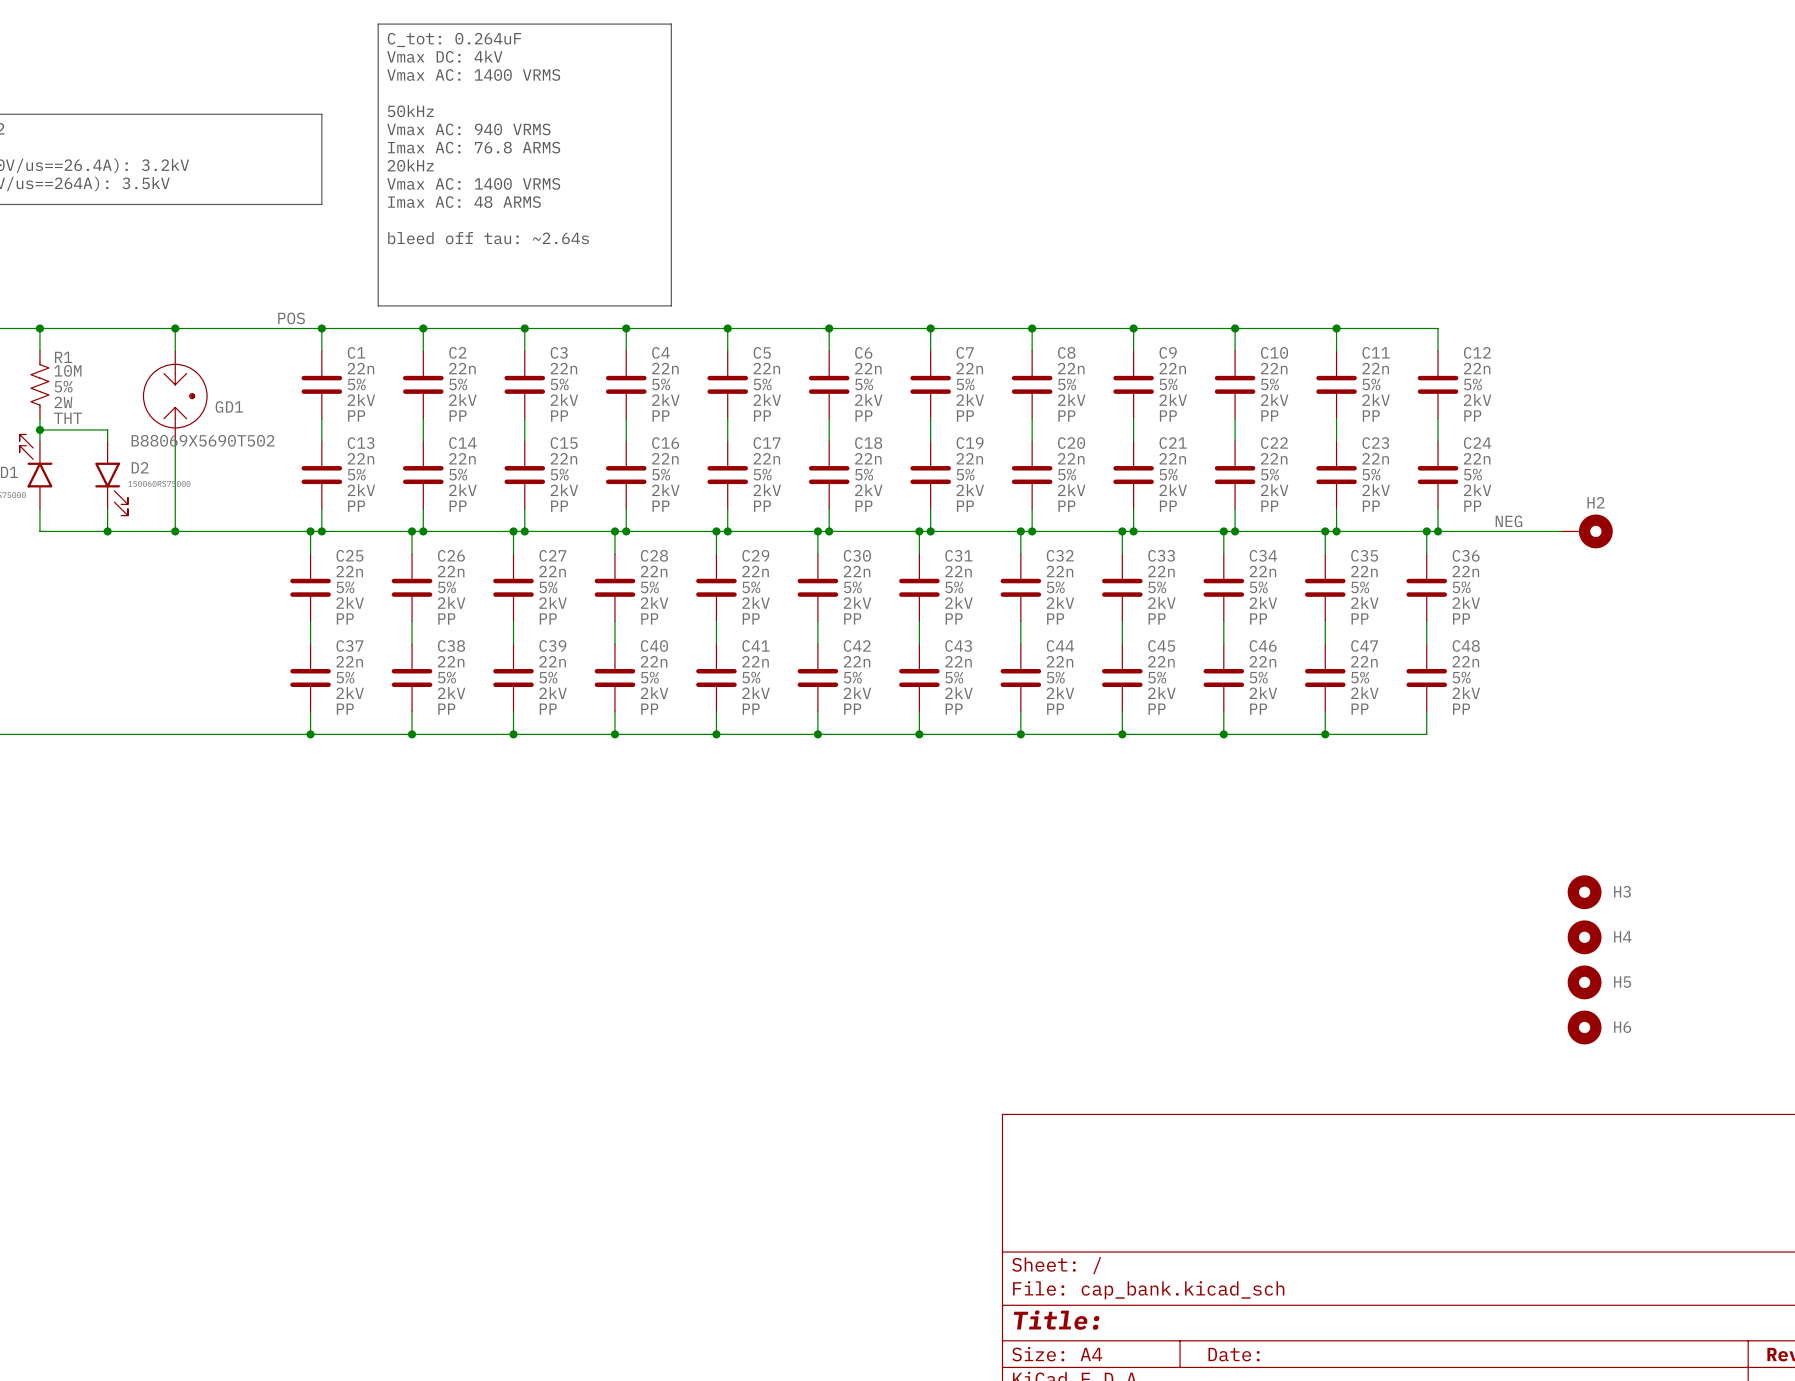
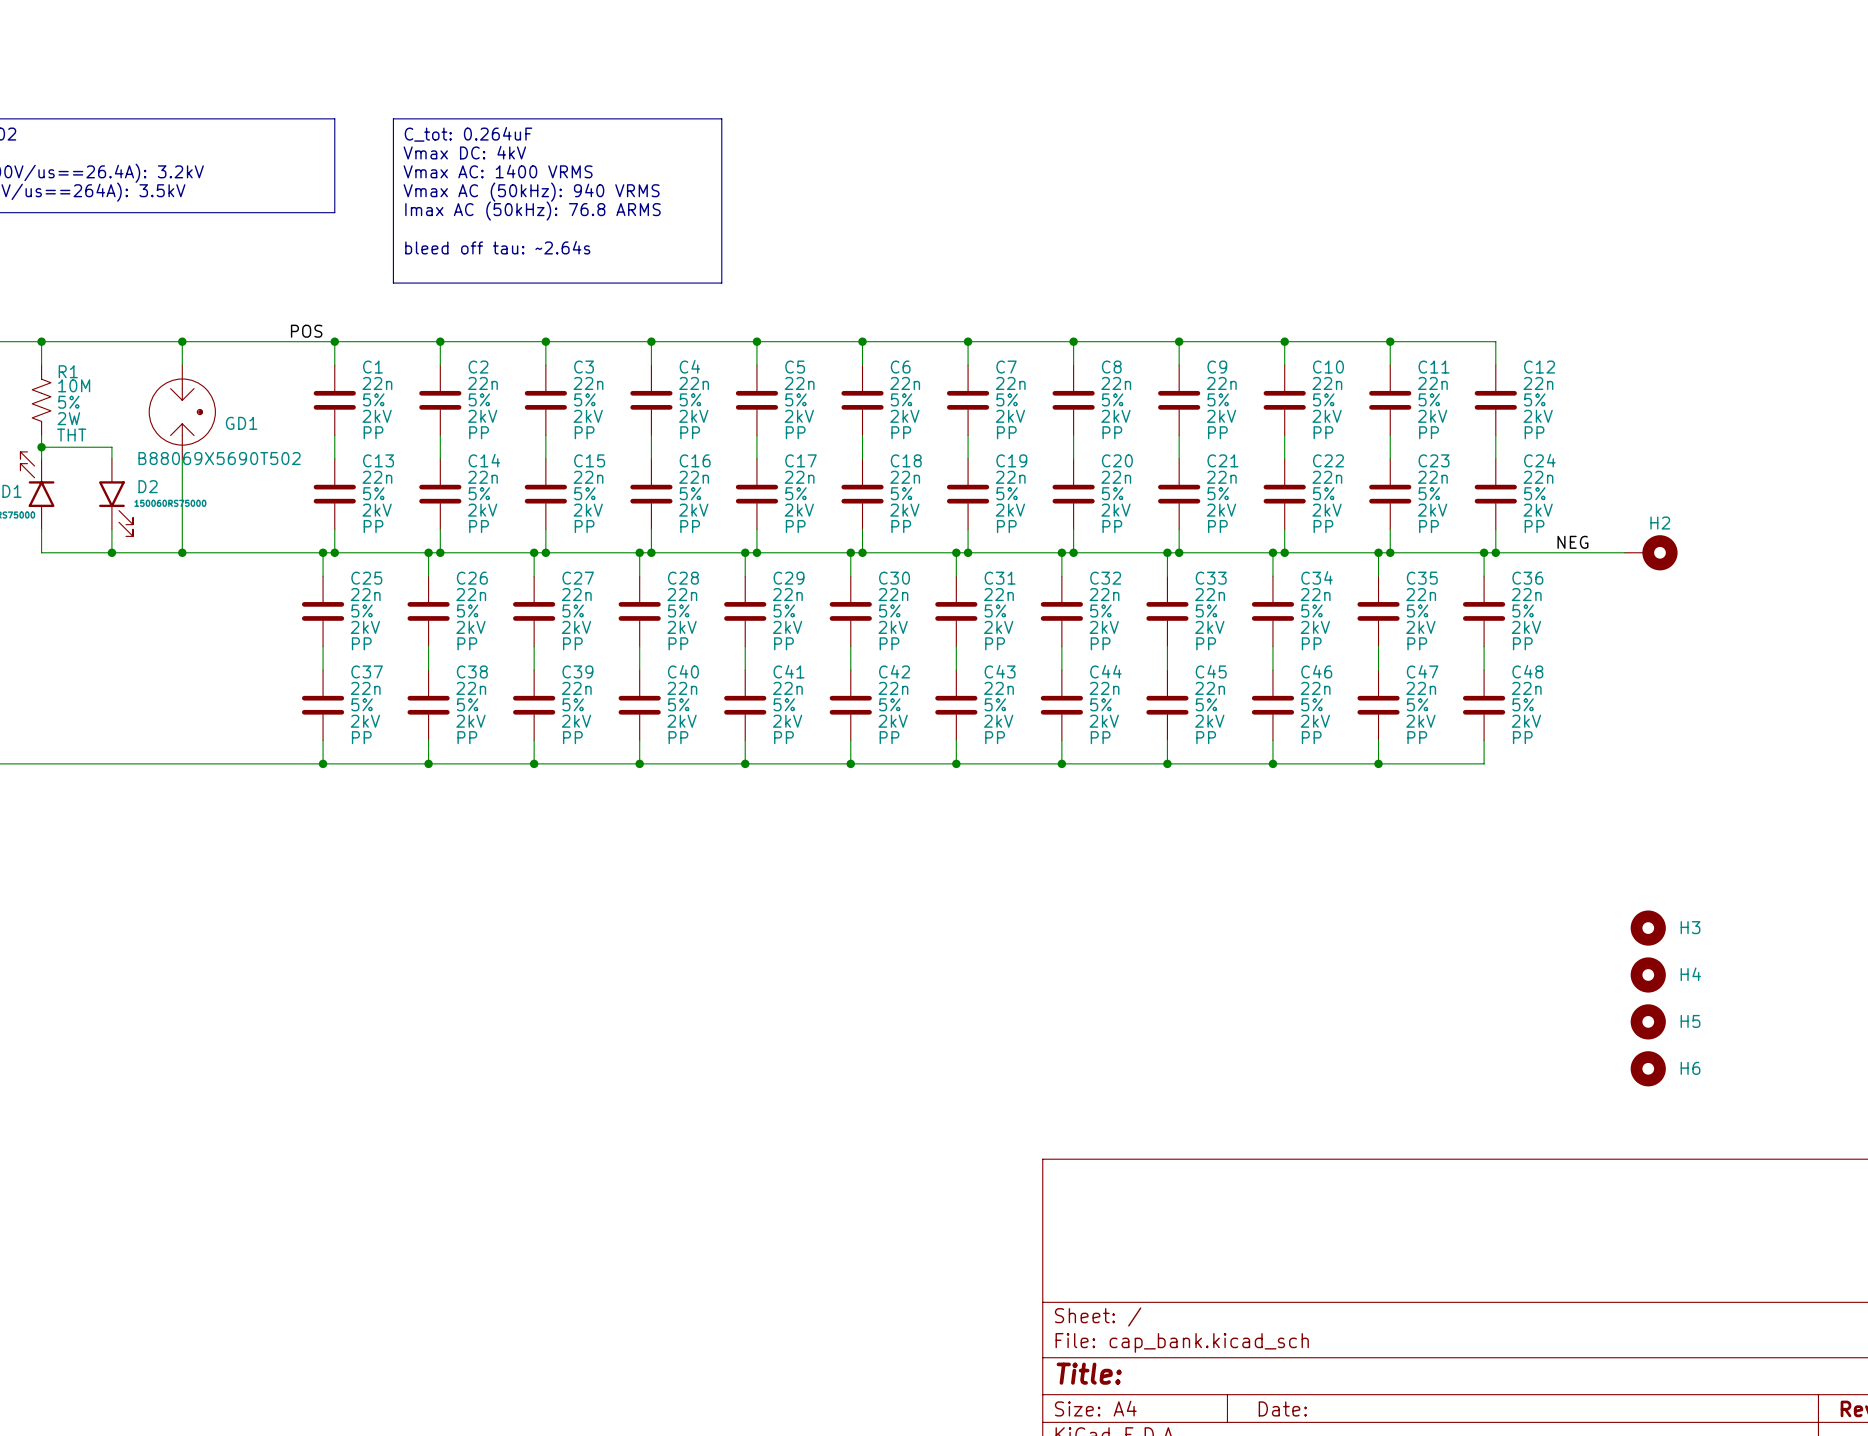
text: C_tot: 0.264uF (454, 39) -> none
text: Vmax DC: 4kV (444, 56) -> none
text: Vmax AC: 1400 VRMS (473, 75) -> none
text: 50kHz (410, 111) -> none
line: (378, 114) (378, 24) (671, 24) (671, 305) (378, 305) (378, 272) -> (393, 118) (721, 118) (721, 283) (393, 283)
text: Vmax AC: 940 VRMS (468, 129) -> C_tot: 0.264uF (468, 134)
text: Imax AC: 76.8 ARMS (474, 147) -> Vmax DC: 4kV (464, 152)
text: 20kHz (410, 165) -> Vmax AC: 1400 VRMS (498, 171)
text: Vmax AC: 1400 VRMS (473, 183) -> Vmax AC (50kHz): 940 VRMS (531, 192)
text: Imax AC: 48 ARMS (464, 202) -> Imax AC (50kHz): 76.8 ARMS (532, 211)

